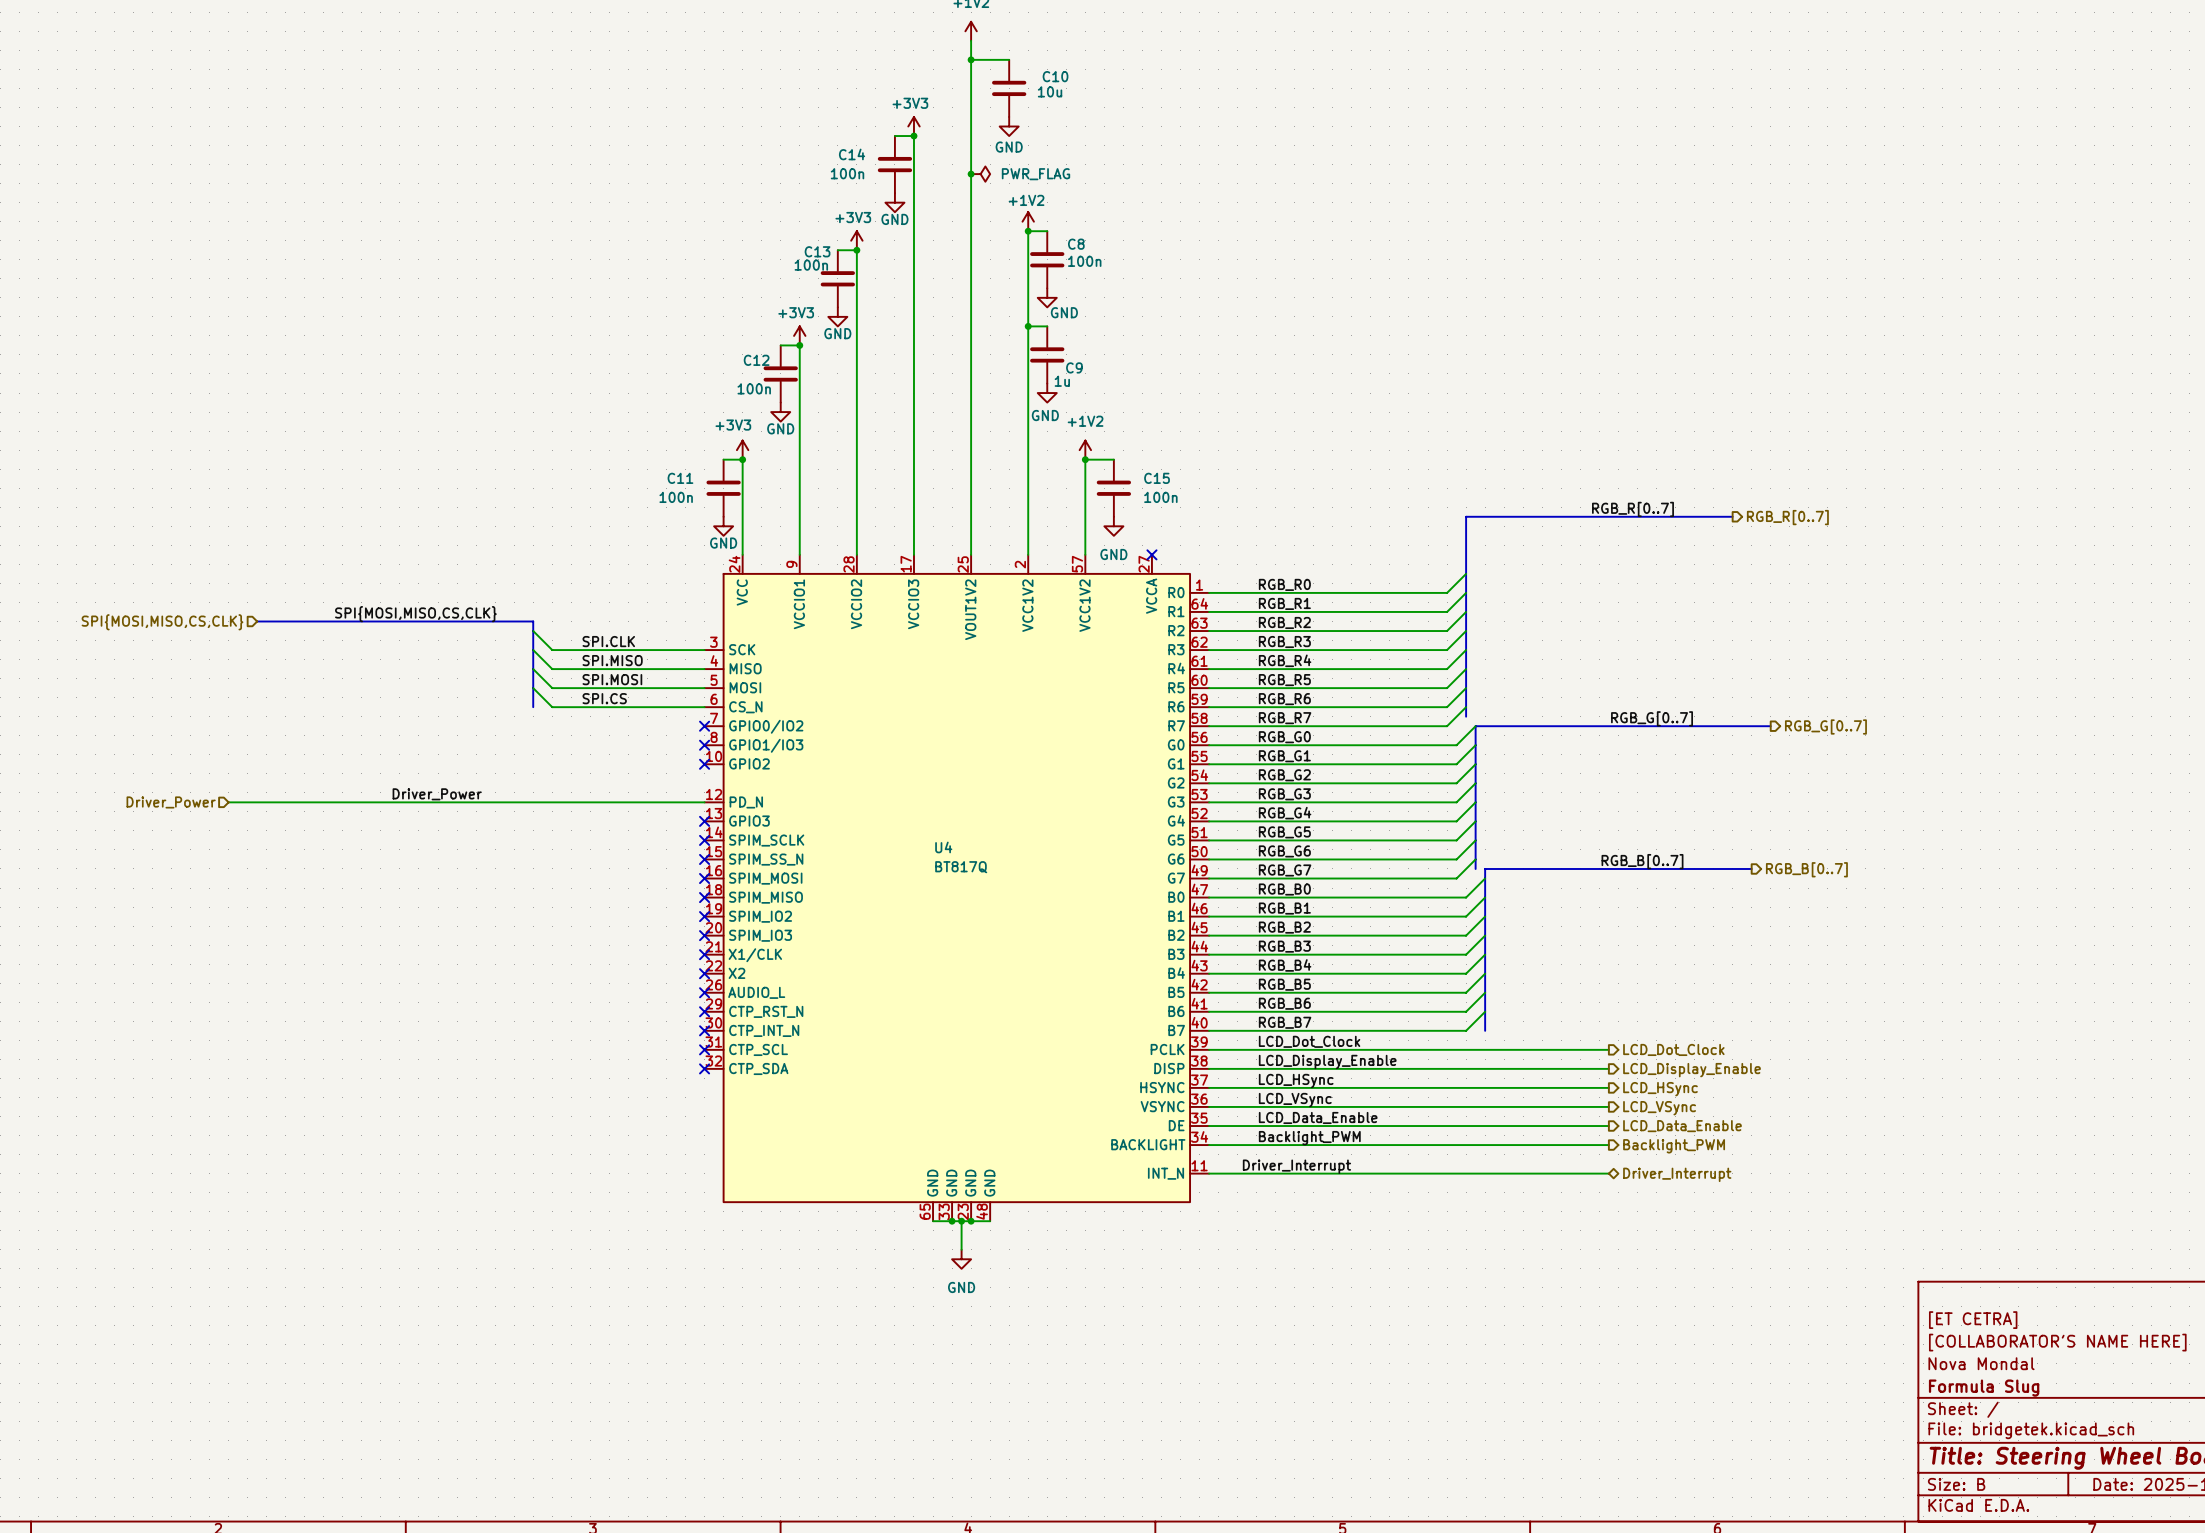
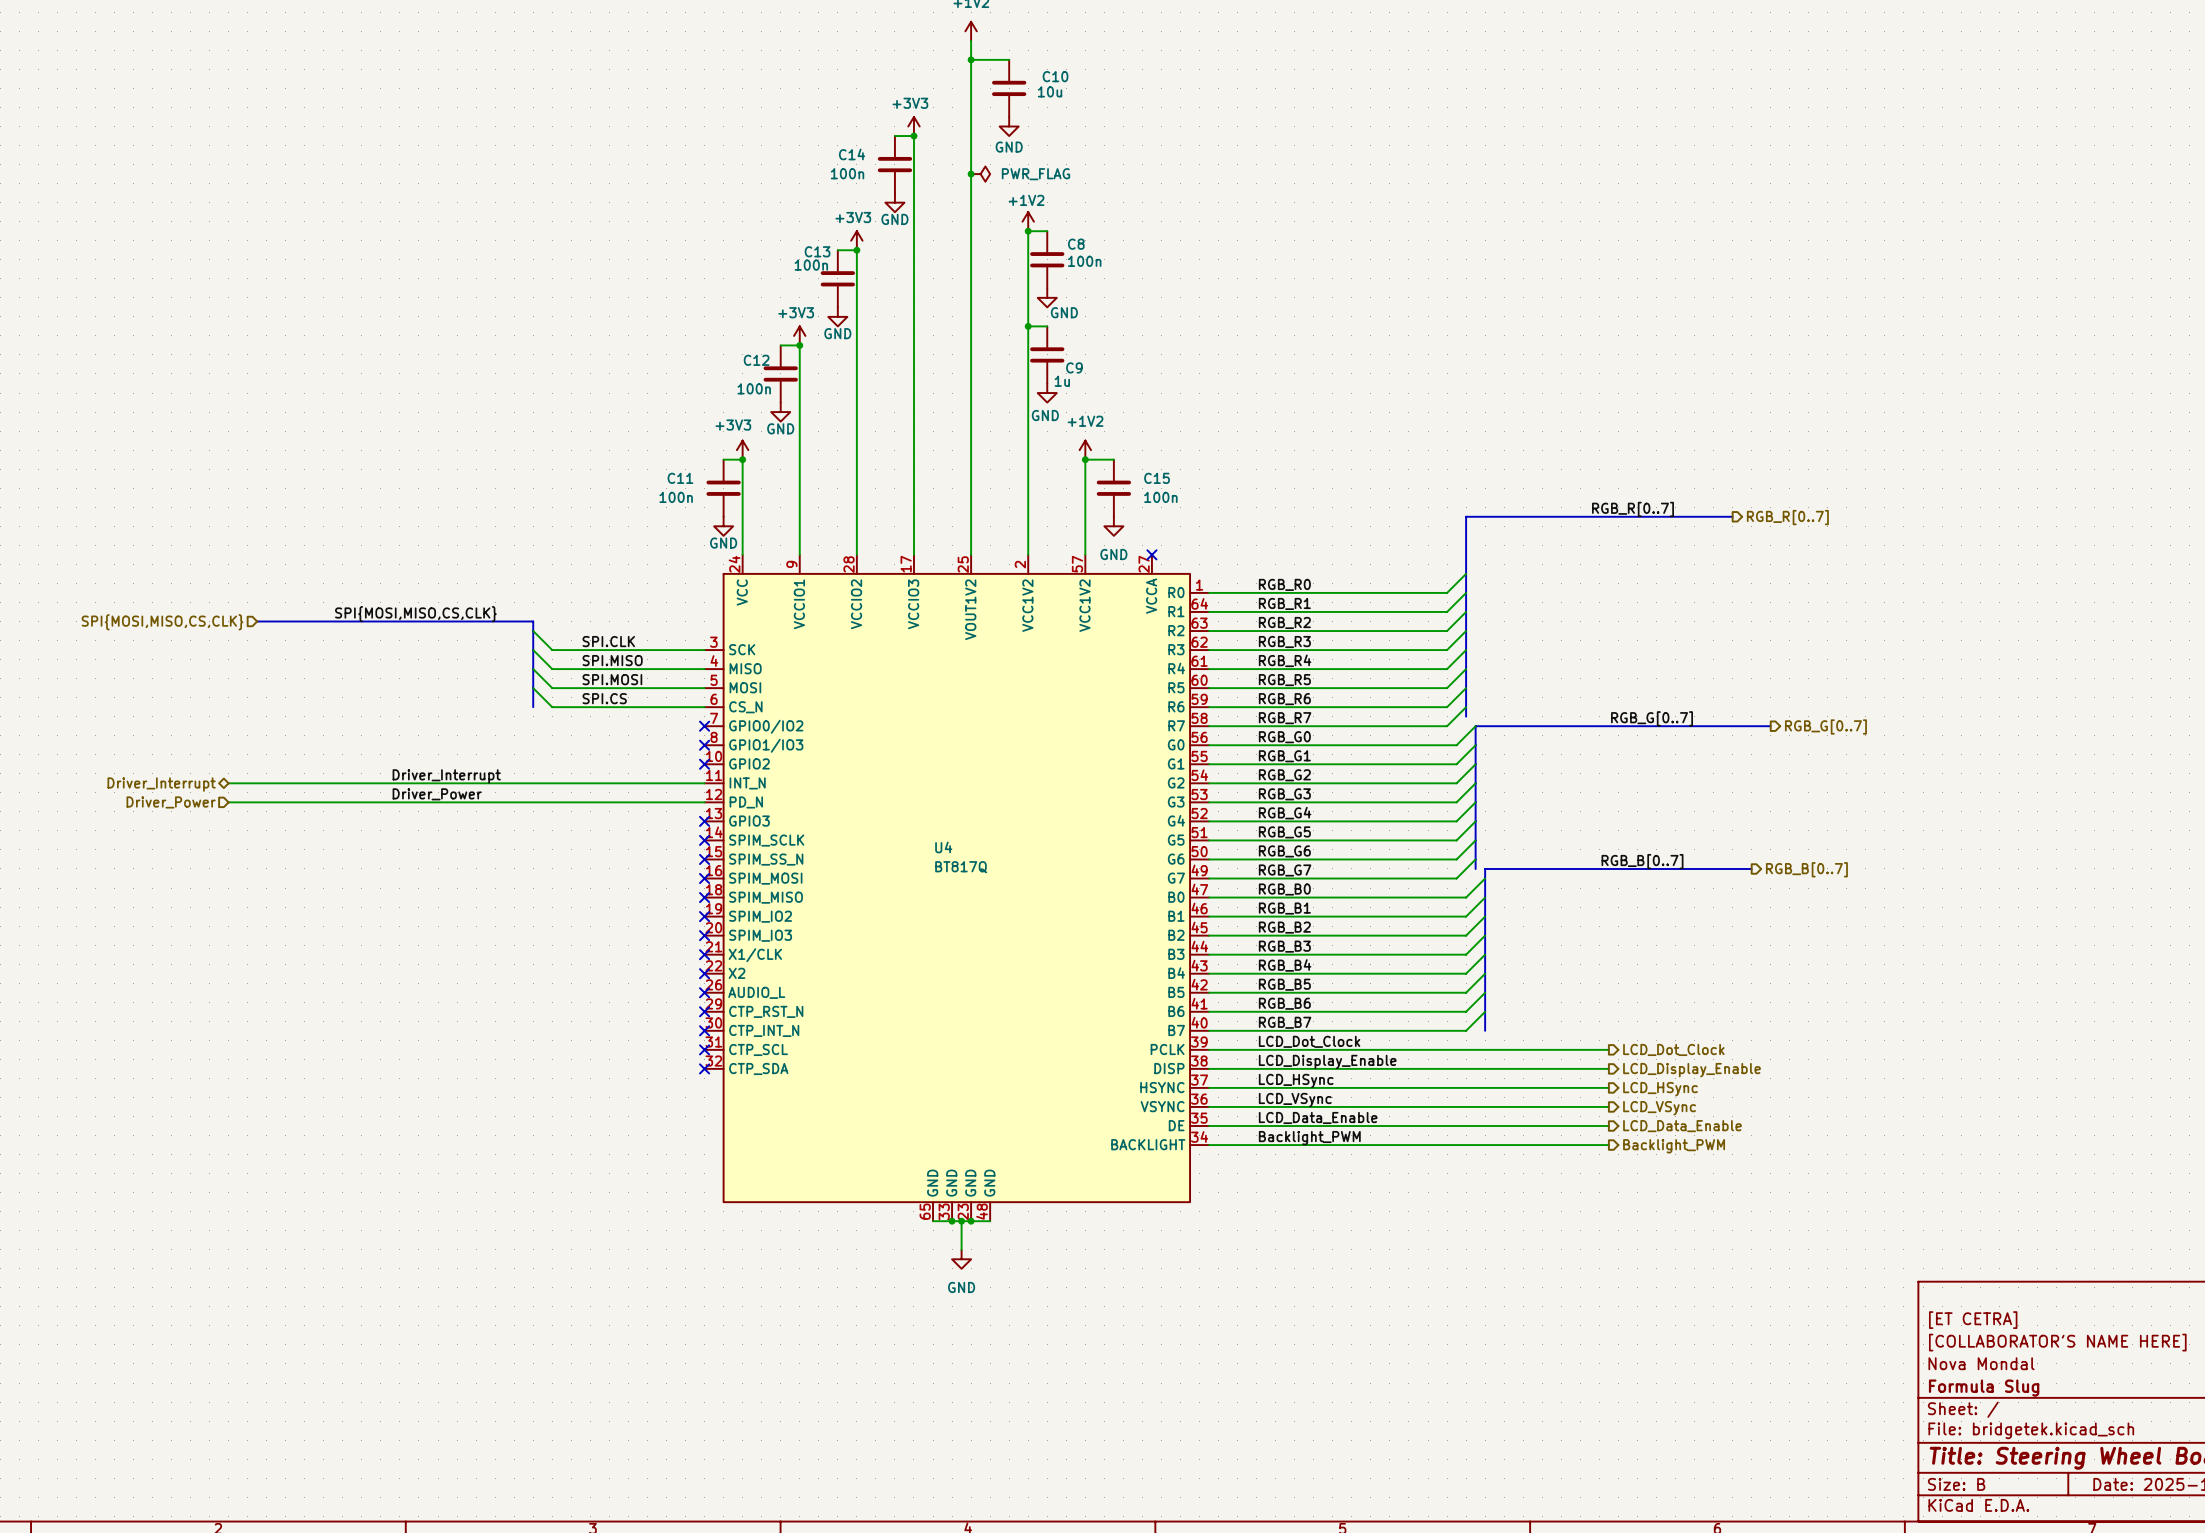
U4 symbol: [704, 554, 1210, 1222] -> [704, 554, 1210, 1222]
label: none -> Driver_Interrupt (446, 776)
wire: none -> (228, 783) (704, 783)
hierarchical label: none -> Driver_Interrupt (161, 784)
label: Driver_Interrupt (1296, 1166) -> none
wire: (1209, 1173) (1608, 1173) -> none
hierarchical label: Driver_Interrupt (1677, 1174) -> none

